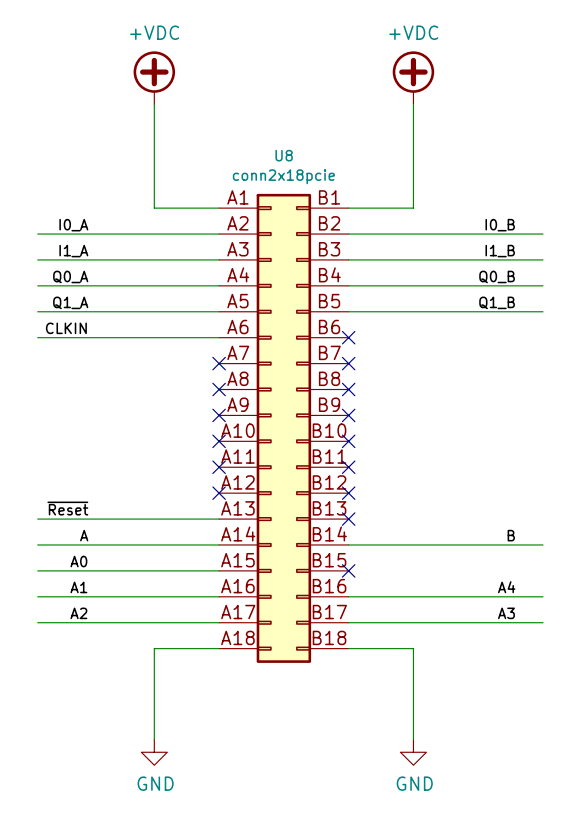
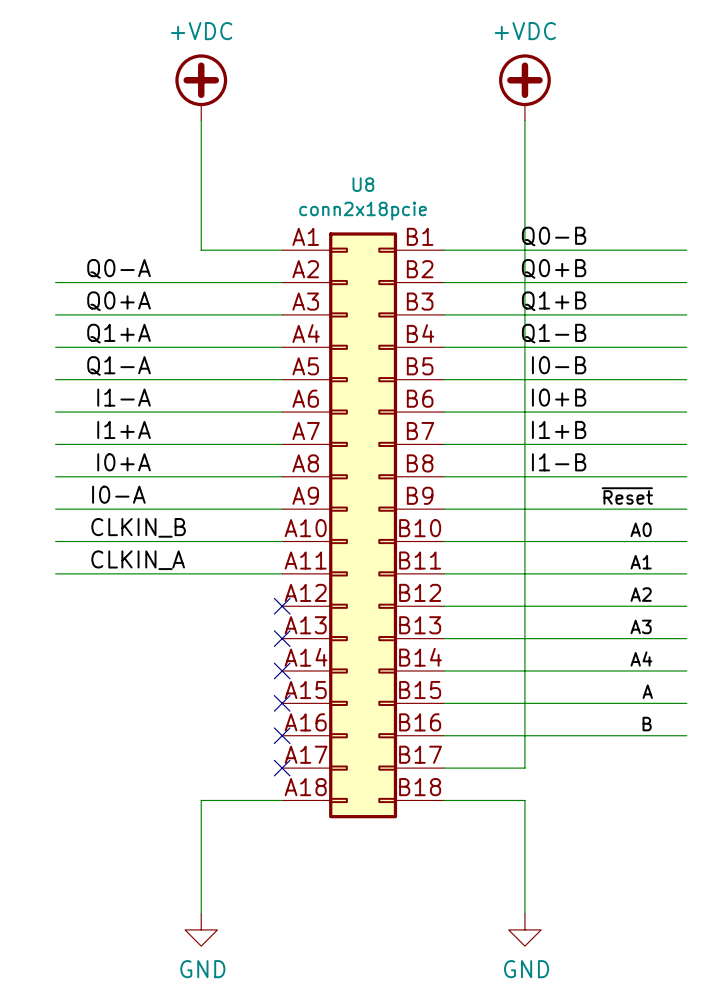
label: none -> Q0-B (554, 236)
label: none -> Q0-A (119, 268)
label: none -> Q0+B (554, 268)
label: I0_A (73, 225) -> none
label: I0_B (500, 225) -> none
label: none -> Q0+A (119, 301)
label: none -> Q1+B (554, 301)
label: I1_A (73, 251) -> none
label: I1_B (500, 251) -> none
label: none -> Q1+A (119, 333)
label: none -> Q1-B (554, 333)
label: Q0_A (70, 276) -> none
label: Q0_B (497, 276) -> none
label: none -> I0-B (559, 365)
label: Q1_A (70, 302) -> Q1-A (119, 365)
label: Q1_B (497, 302) -> none
label: none -> I1-A (124, 397)
label: none -> I0+B (559, 397)
label: CLKIN (66, 328) -> none
wire: none -> (444, 412) (686, 412)
no-connect mark: (348, 337) -> none
label: none -> I1+A (124, 429)
label: none -> I1+B (559, 429)
no-connect mark: (219, 363) -> none
wire: none -> (444, 444) (686, 444)
no-connect mark: (348, 363) -> none
label: none -> I0+A (124, 462)
label: none -> I1-B (559, 462)
no-connect mark: (219, 389) -> none
wire: none -> (444, 476) (686, 476)
no-connect mark: (348, 389) -> none
label: none -> I0-A (118, 494)
label: none -> ~{Reset} (627, 496)
no-connect mark: (219, 415) -> none
wire: none -> (444, 509) (686, 509)
no-connect mark: (348, 415) -> none
label: none -> CLKIN_B (138, 527)
label: none -> A0 (641, 529)
no-connect mark: (219, 441) -> none
wire: none -> (444, 541) (686, 541)
no-connect mark: (348, 441) -> none
label: none -> CLKIN_A (138, 560)
label: none -> A1 (641, 562)
no-connect mark: (219, 467) -> none
wire: none -> (444, 573) (686, 573)
no-connect mark: (348, 467) -> none
label: none -> A2 (641, 594)
wire: none -> (444, 606) (686, 606)
no-connect mark: (348, 493) -> none
label: ~{Reset} (67, 508) -> none
wire: (37, 519) (219, 519) -> (55, 444) (282, 444)
no-connect mark: none -> (282, 638)
wire: none -> (444, 638) (686, 638)
no-connect mark: (348, 519) -> none
label: A (84, 535) -> none
label: B (511, 535) -> A4 (641, 659)
wire: (37, 544) (219, 544) -> (55, 476) (282, 476)
no-connect mark: none -> (282, 670)
label: A0 (78, 561) -> none
label: none -> A (647, 691)
wire: (37, 570) (219, 570) -> (55, 509) (282, 509)
no-connect mark: none -> (282, 703)
wire: none -> (444, 703) (686, 703)
no-connect mark: (348, 570) -> none
label: A1 (78, 587) -> none
label: A4 (506, 587) -> B (647, 724)
wire: (37, 596) (219, 596) -> (55, 541) (282, 541)
no-connect mark: none -> (282, 735)
label: A2 (78, 613) -> none
label position: A3 (506, 613) -> A3 (641, 626)
wire: (37, 622) (219, 622) -> (55, 573) (282, 573)
no-connect mark: none -> (282, 768)
wire: (413, 622) (543, 622) -> (524, 768) (524, 250) (686, 250)

